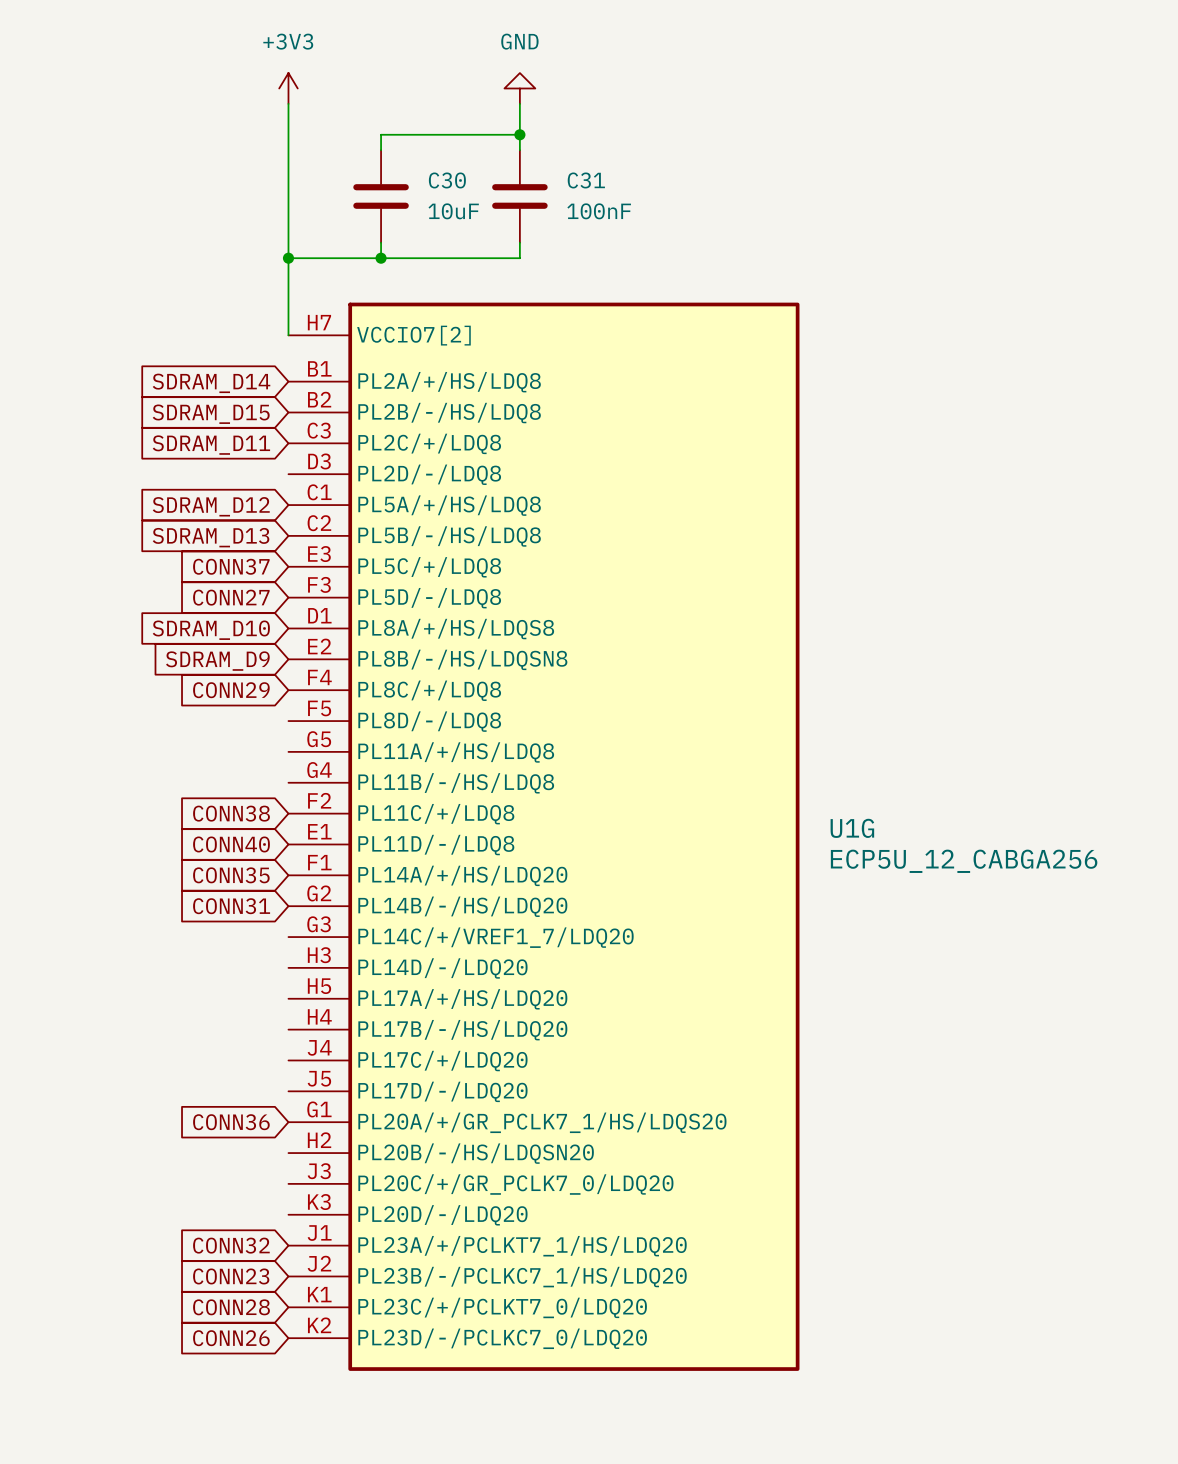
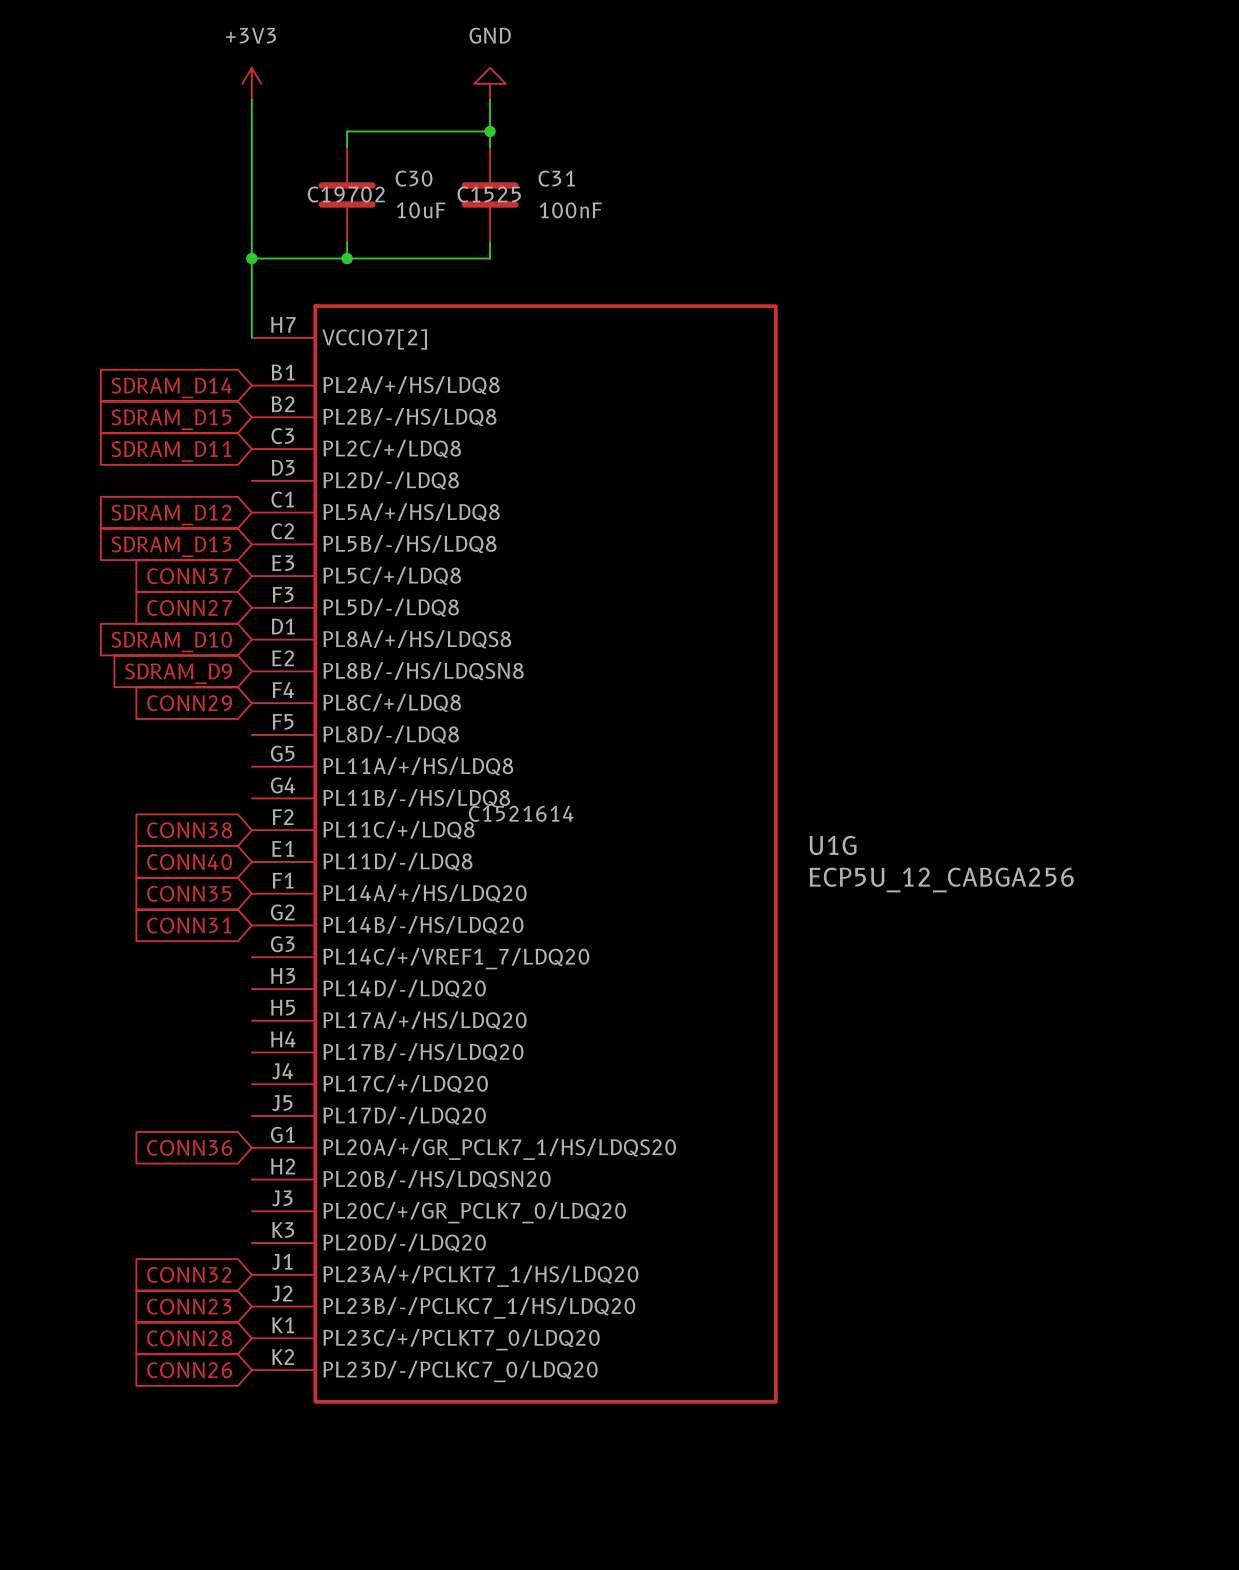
C30 text: none -> C19702 (346, 194)
C31 text: none -> C1525 (489, 194)
U1G text: none -> C1521614 (521, 813)

